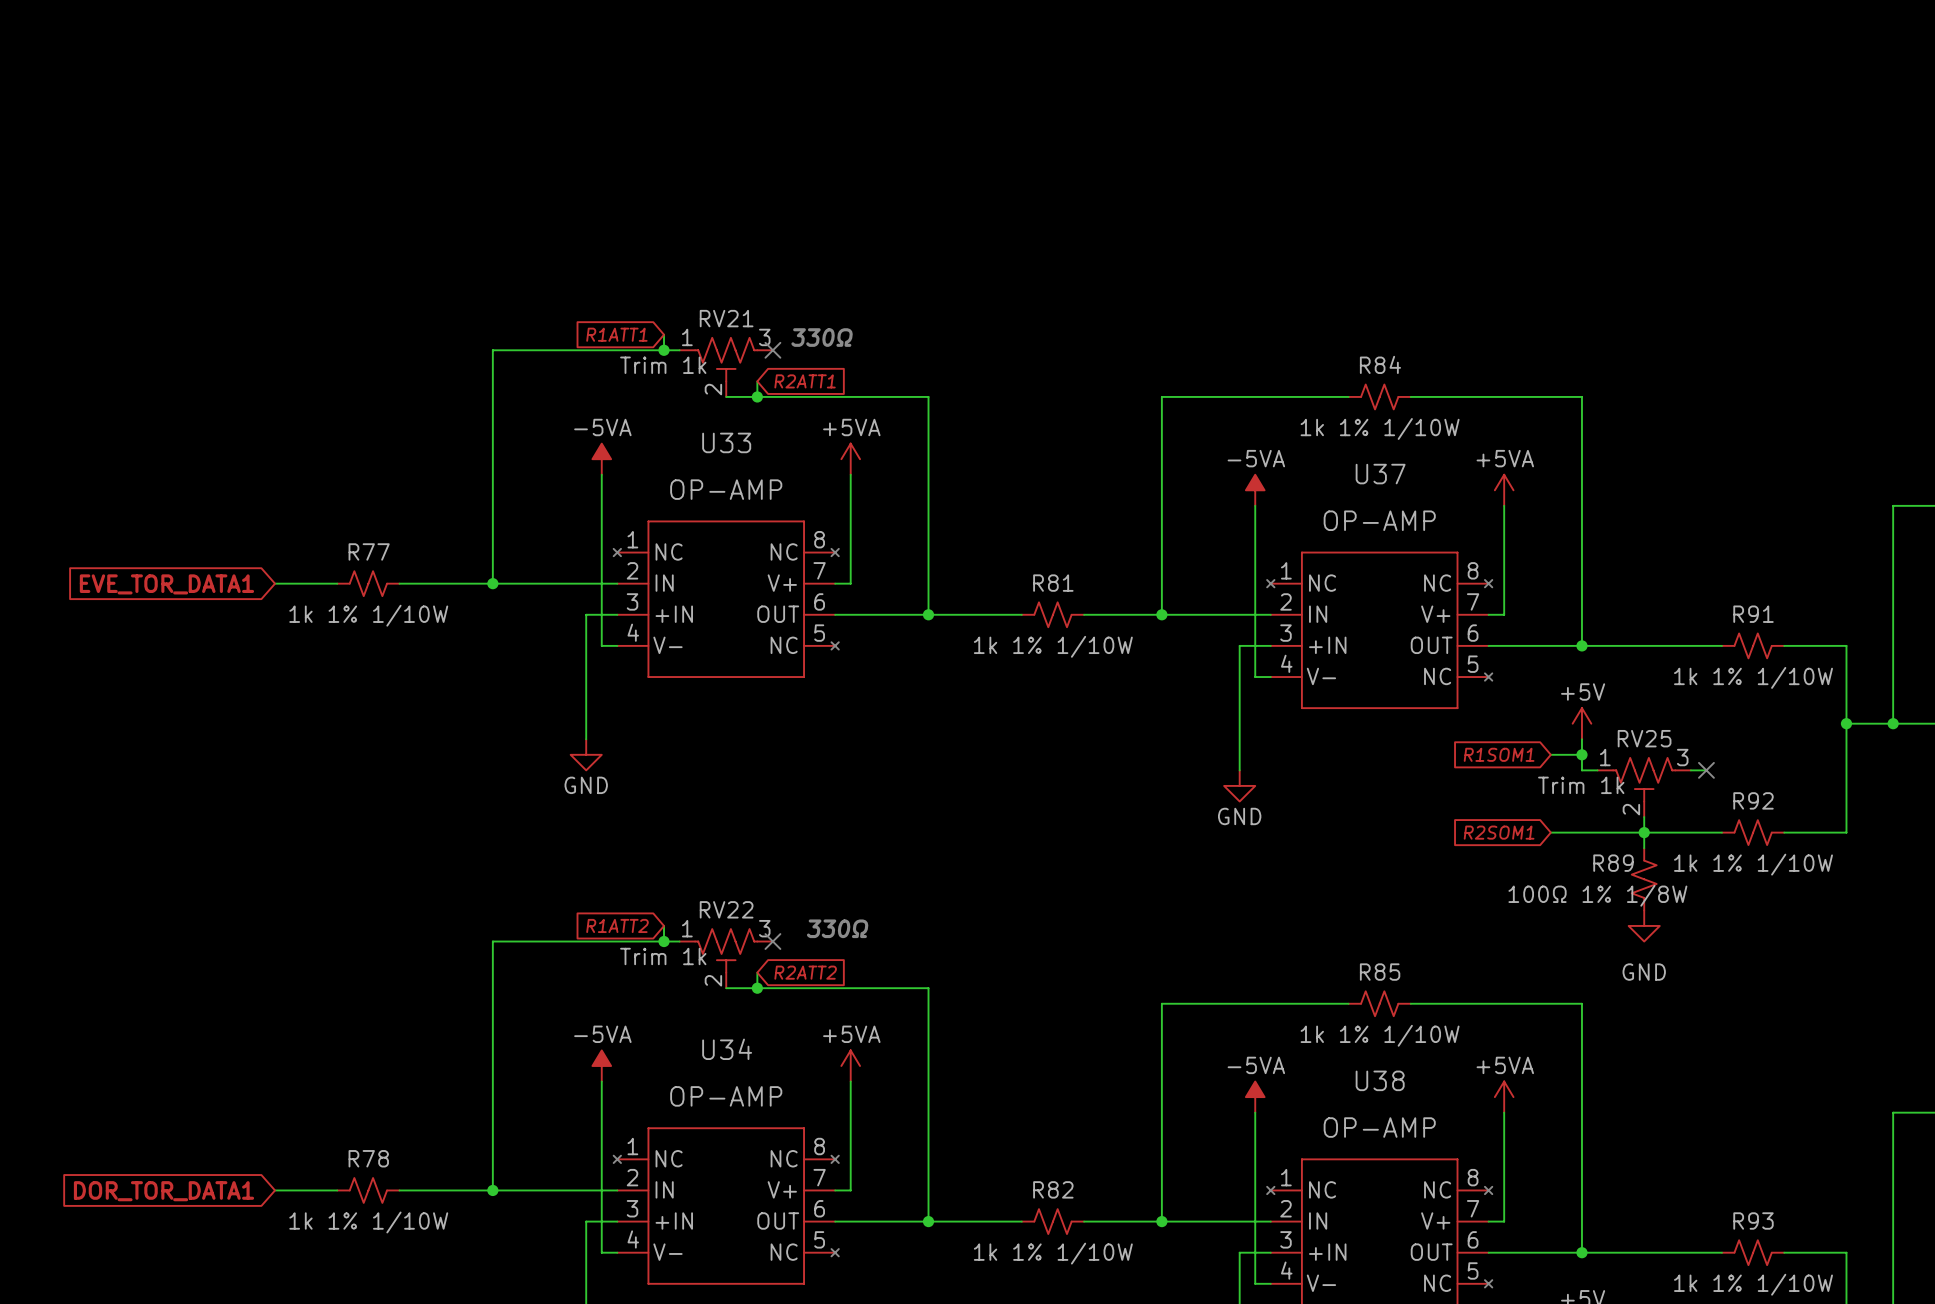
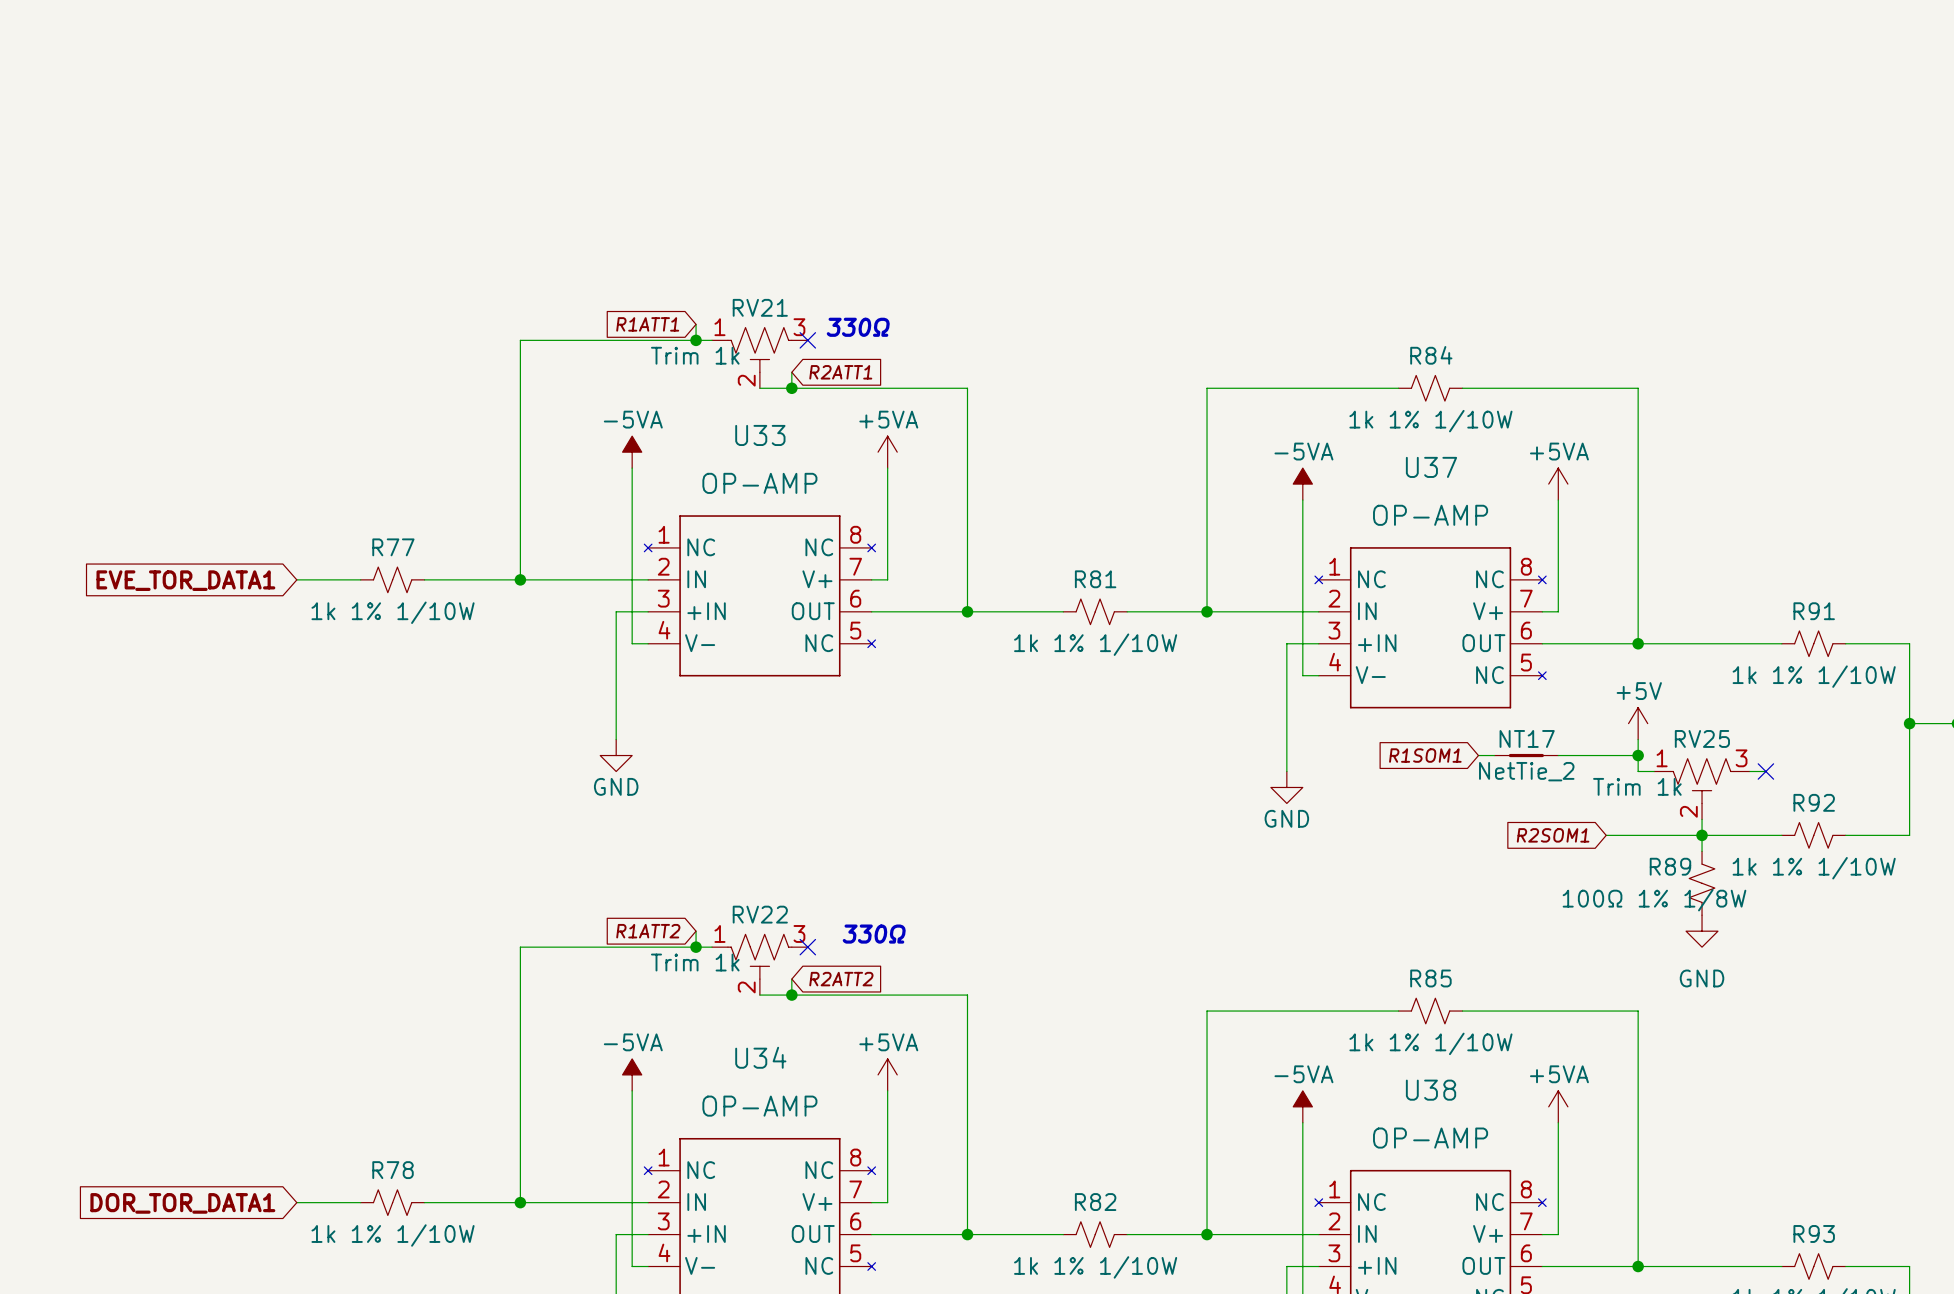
wire: none -> (1478, 755) (1494, 755)
NT17: none -> NetTie_2 (1526, 755)
global label position: R1SOM1 (1499, 754) -> R1SOM1 (1425, 755)
wire: none -> (1558, 755) (1606, 755)

